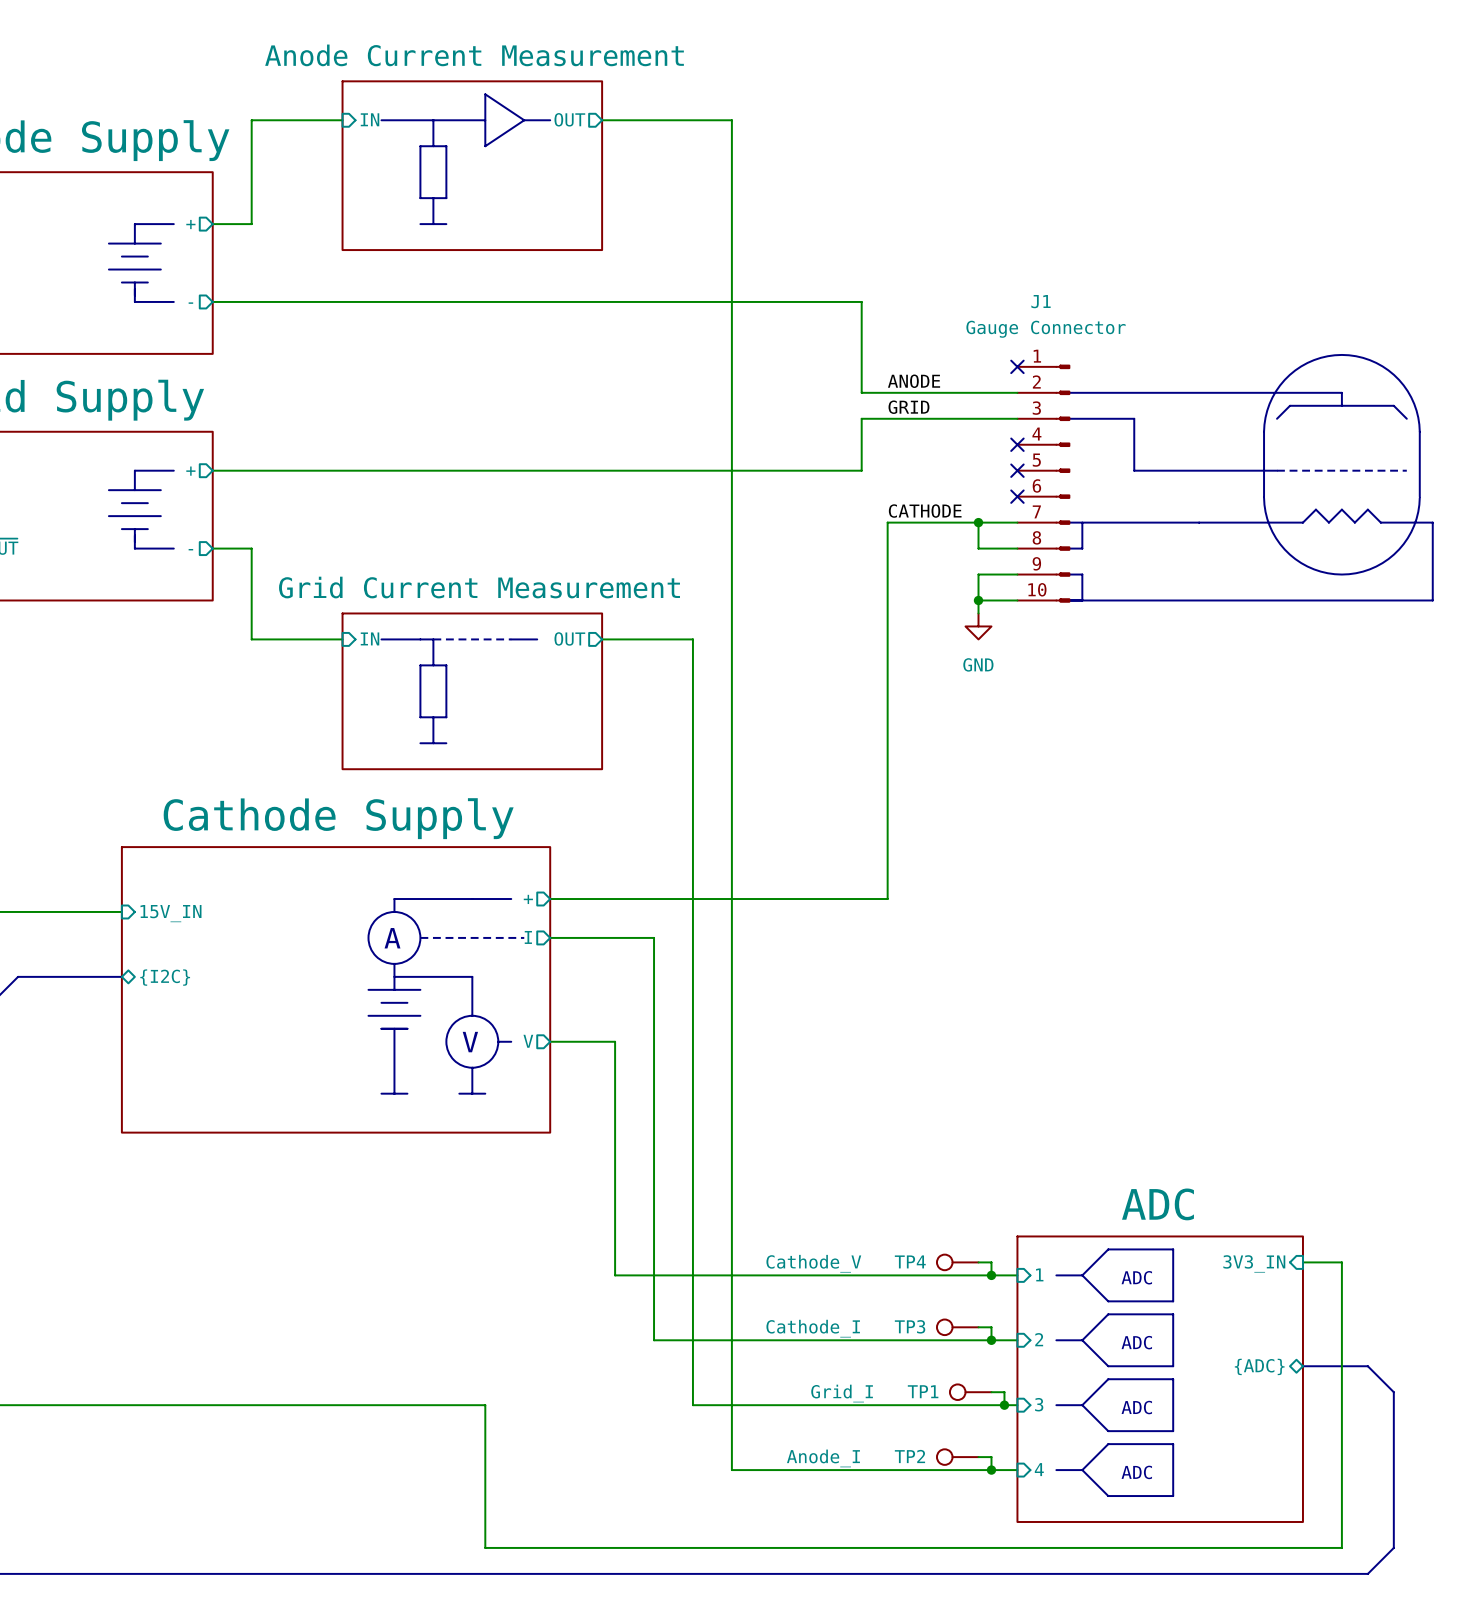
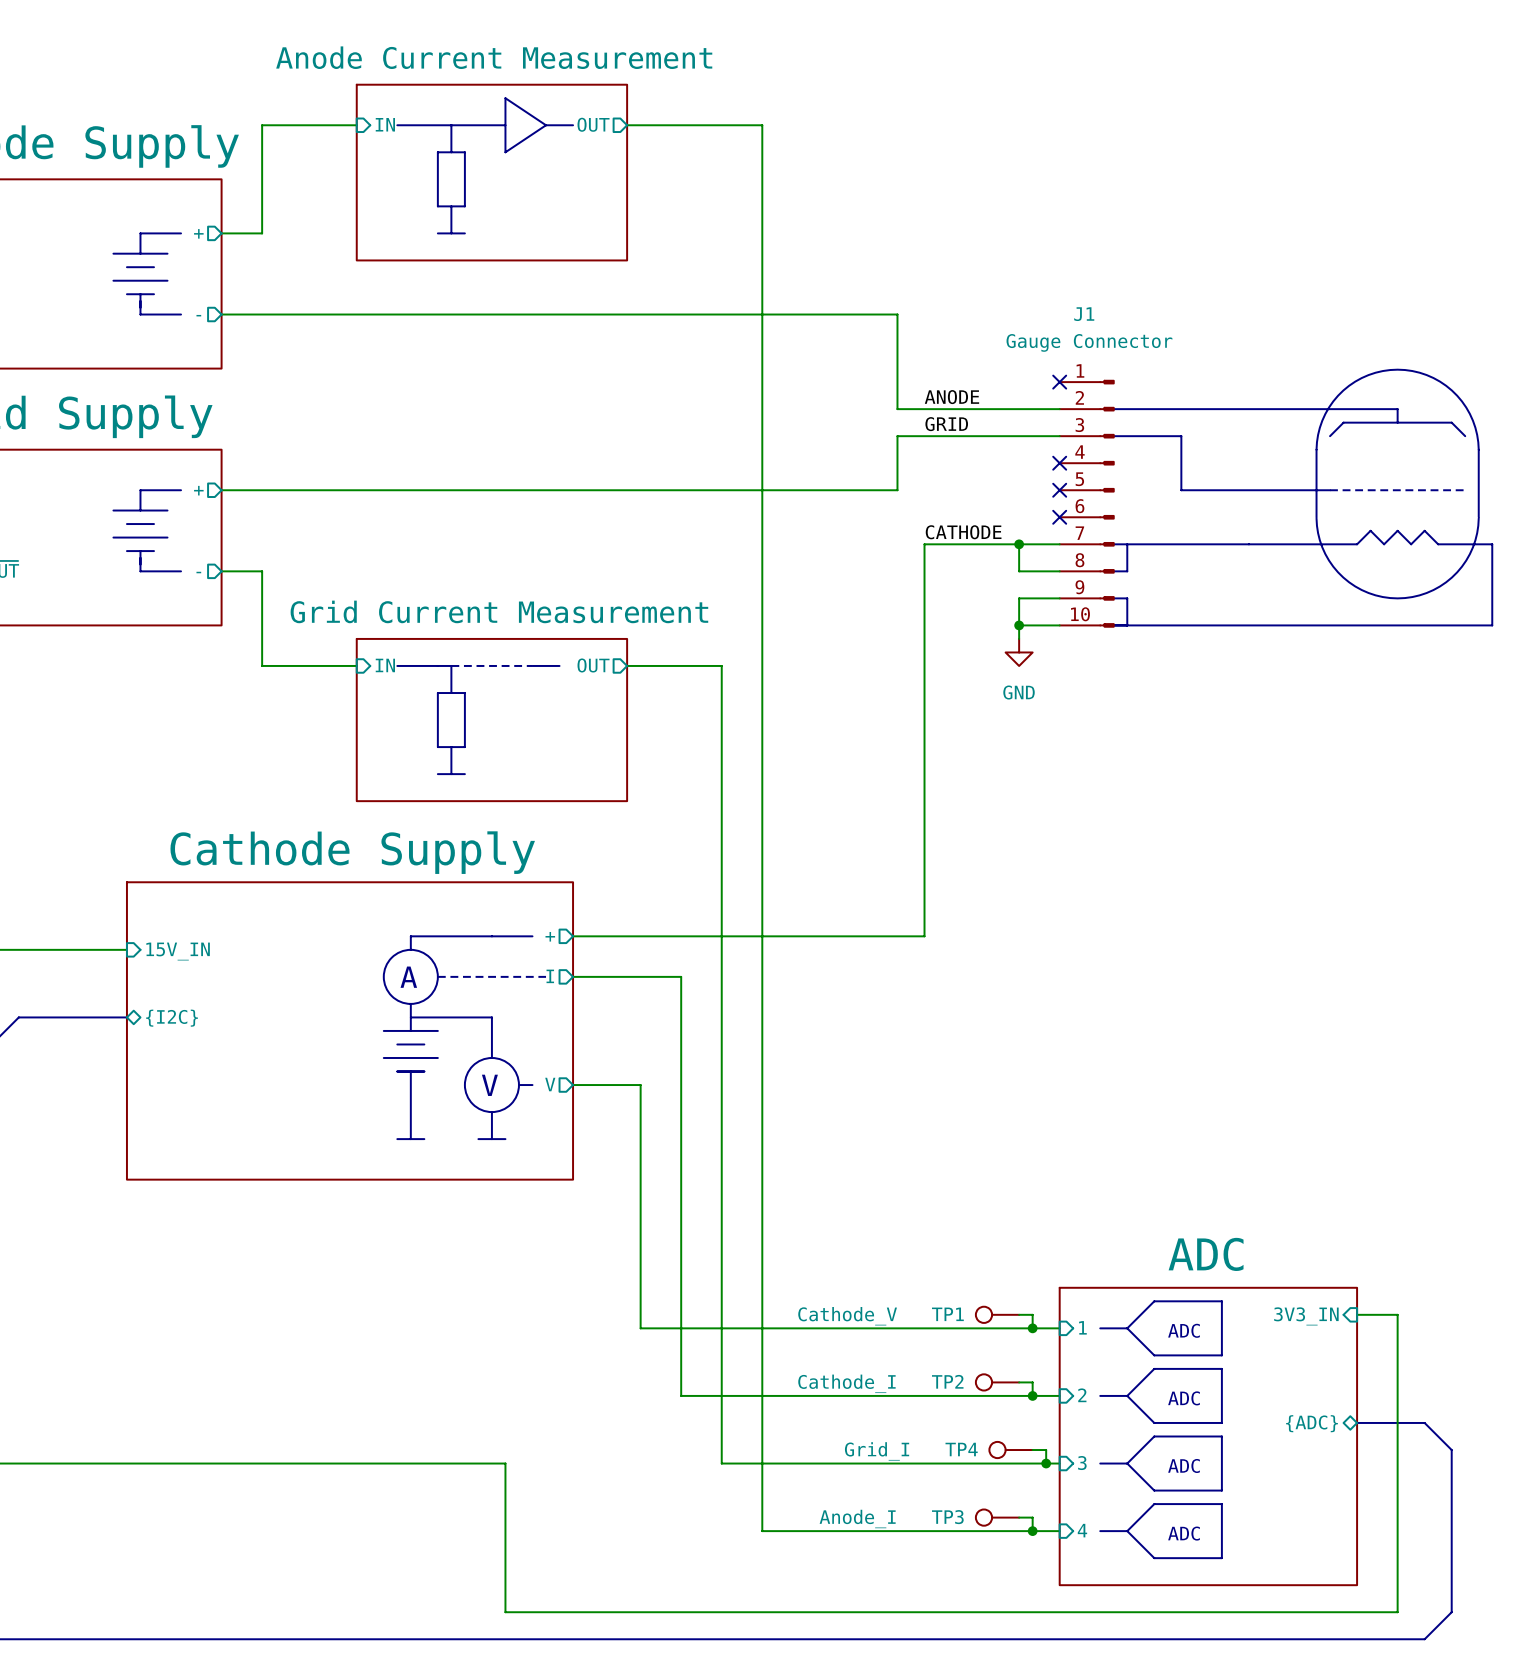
TP4 name: TP4 (910, 1261) -> TP1 (947, 1314)
TP3 name: TP3 (910, 1326) -> TP2 (947, 1381)
TP1 name: TP1 (923, 1391) -> TP4 (961, 1449)
TP2 name: TP2 (909, 1456) -> TP3 (947, 1517)

